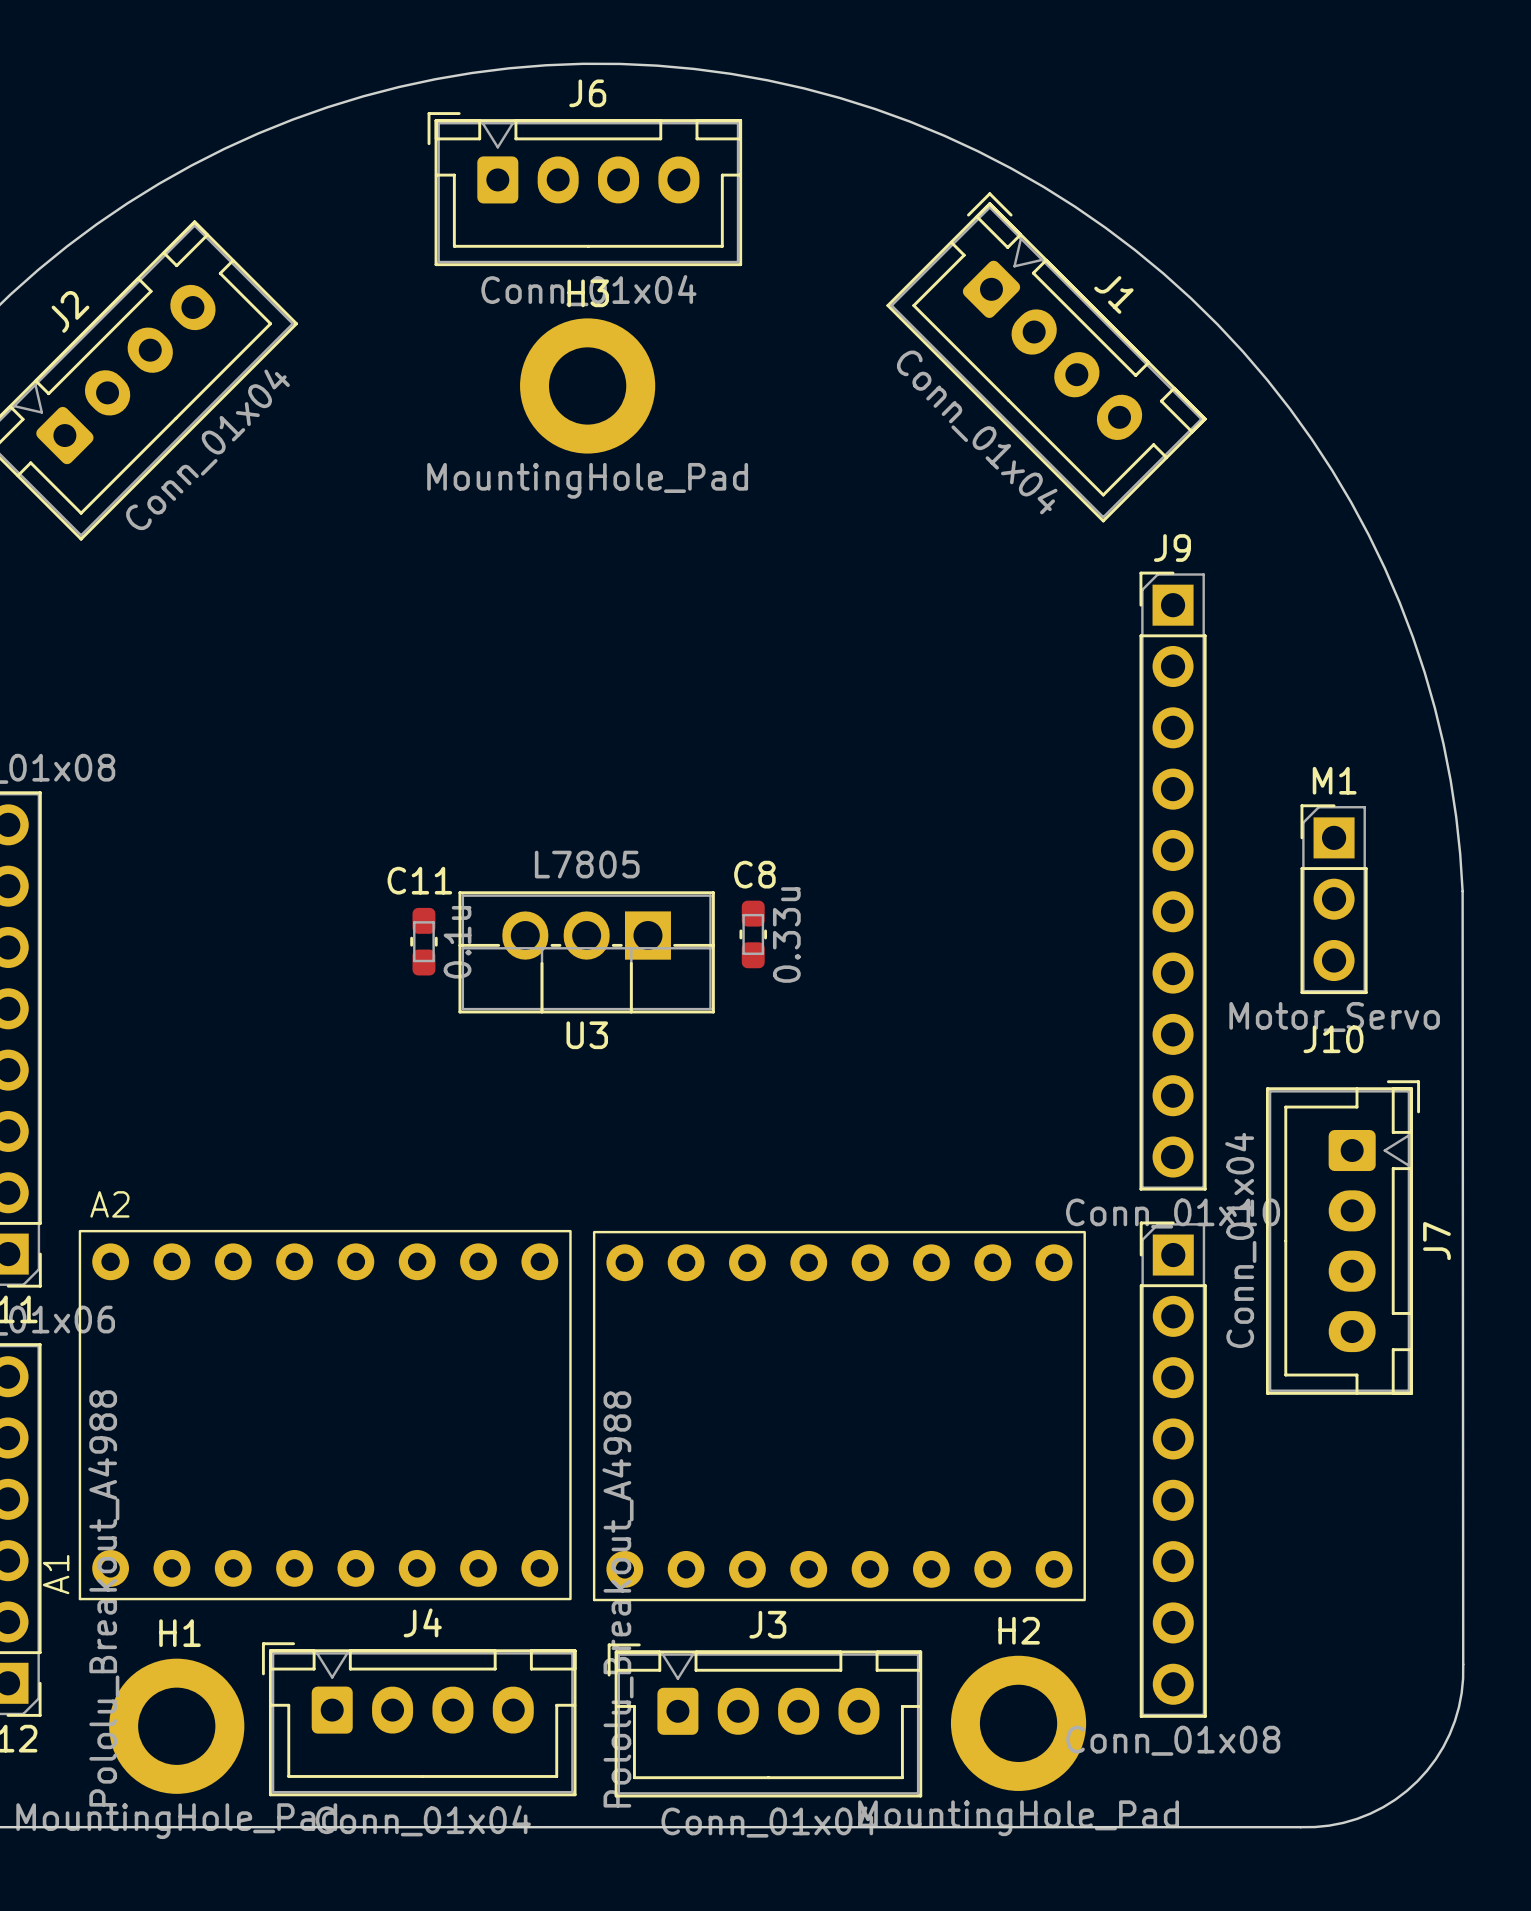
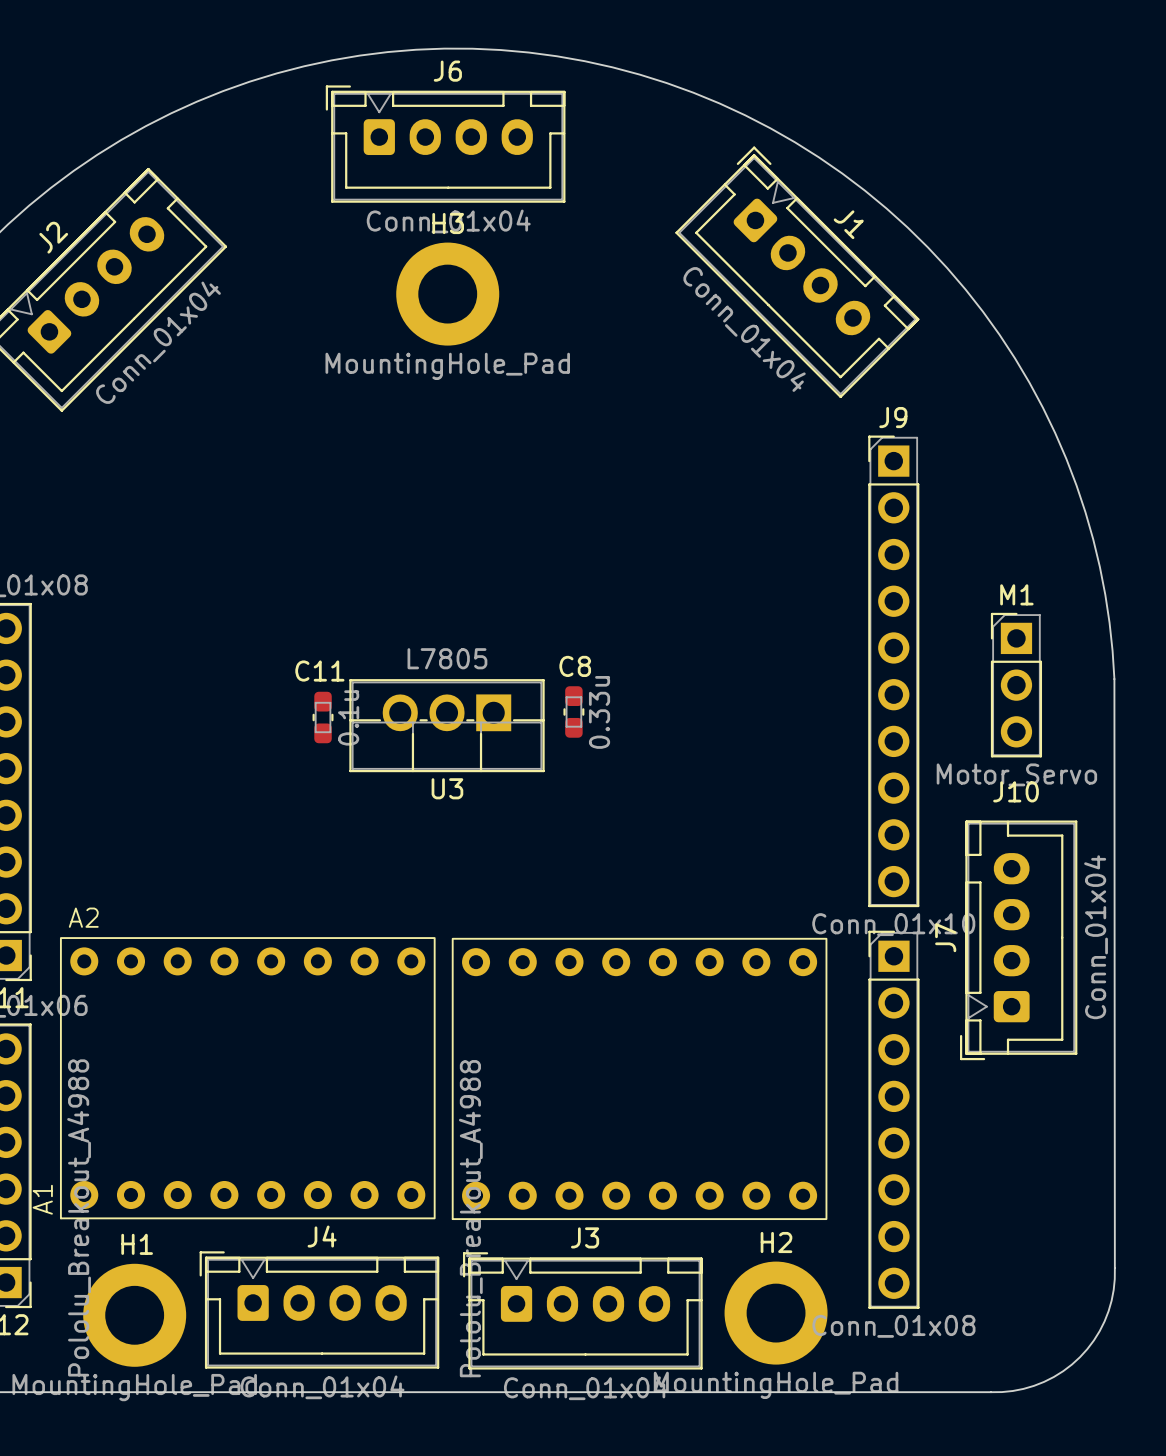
J7 rotation: 0° (1342, 1237) -> 180° (1018, 940)

